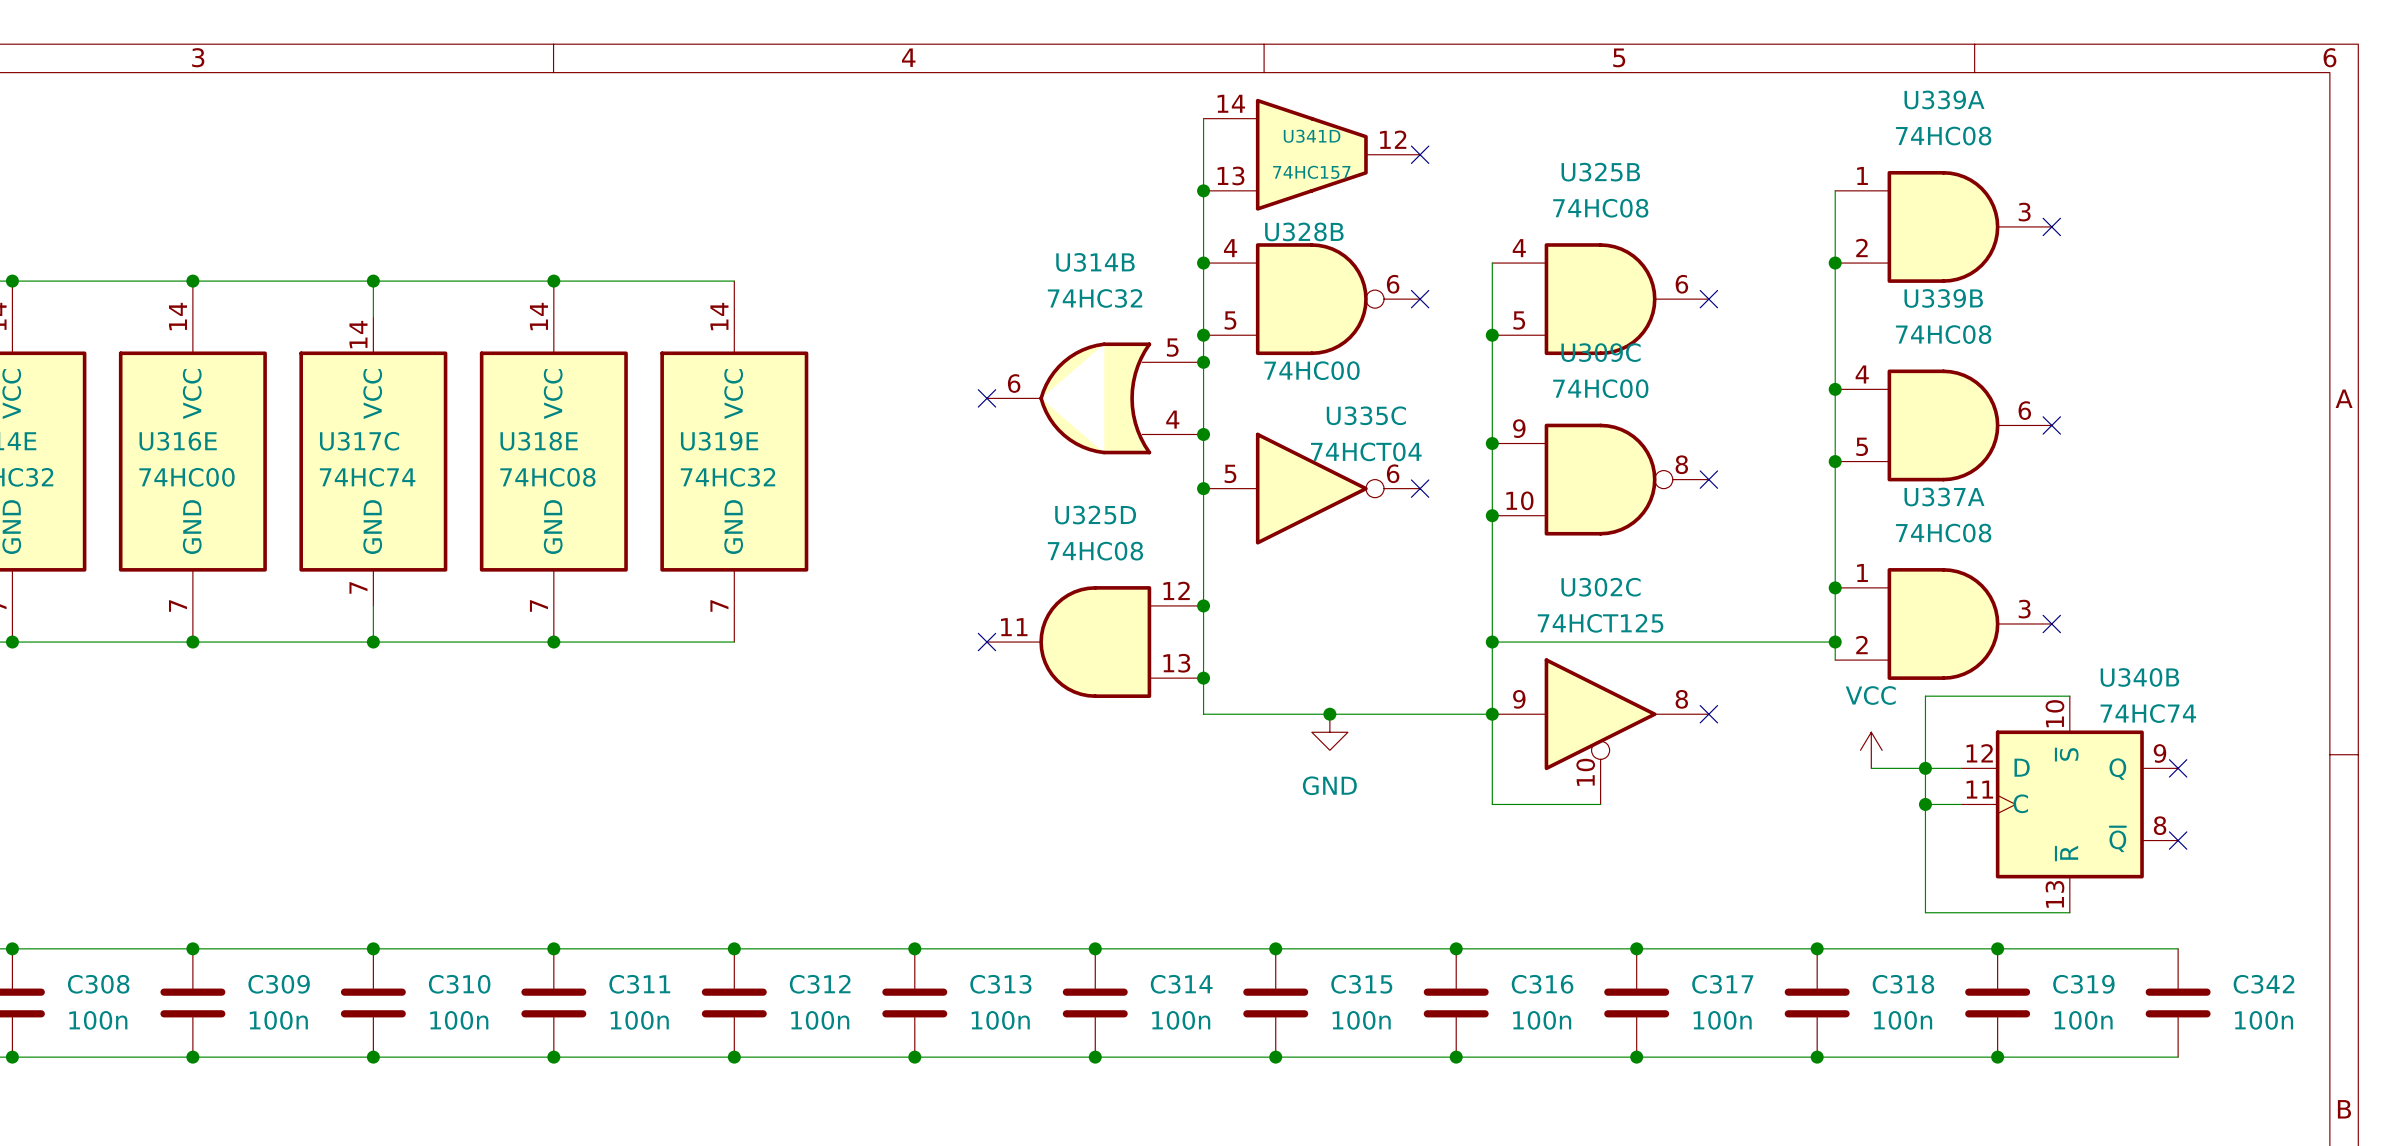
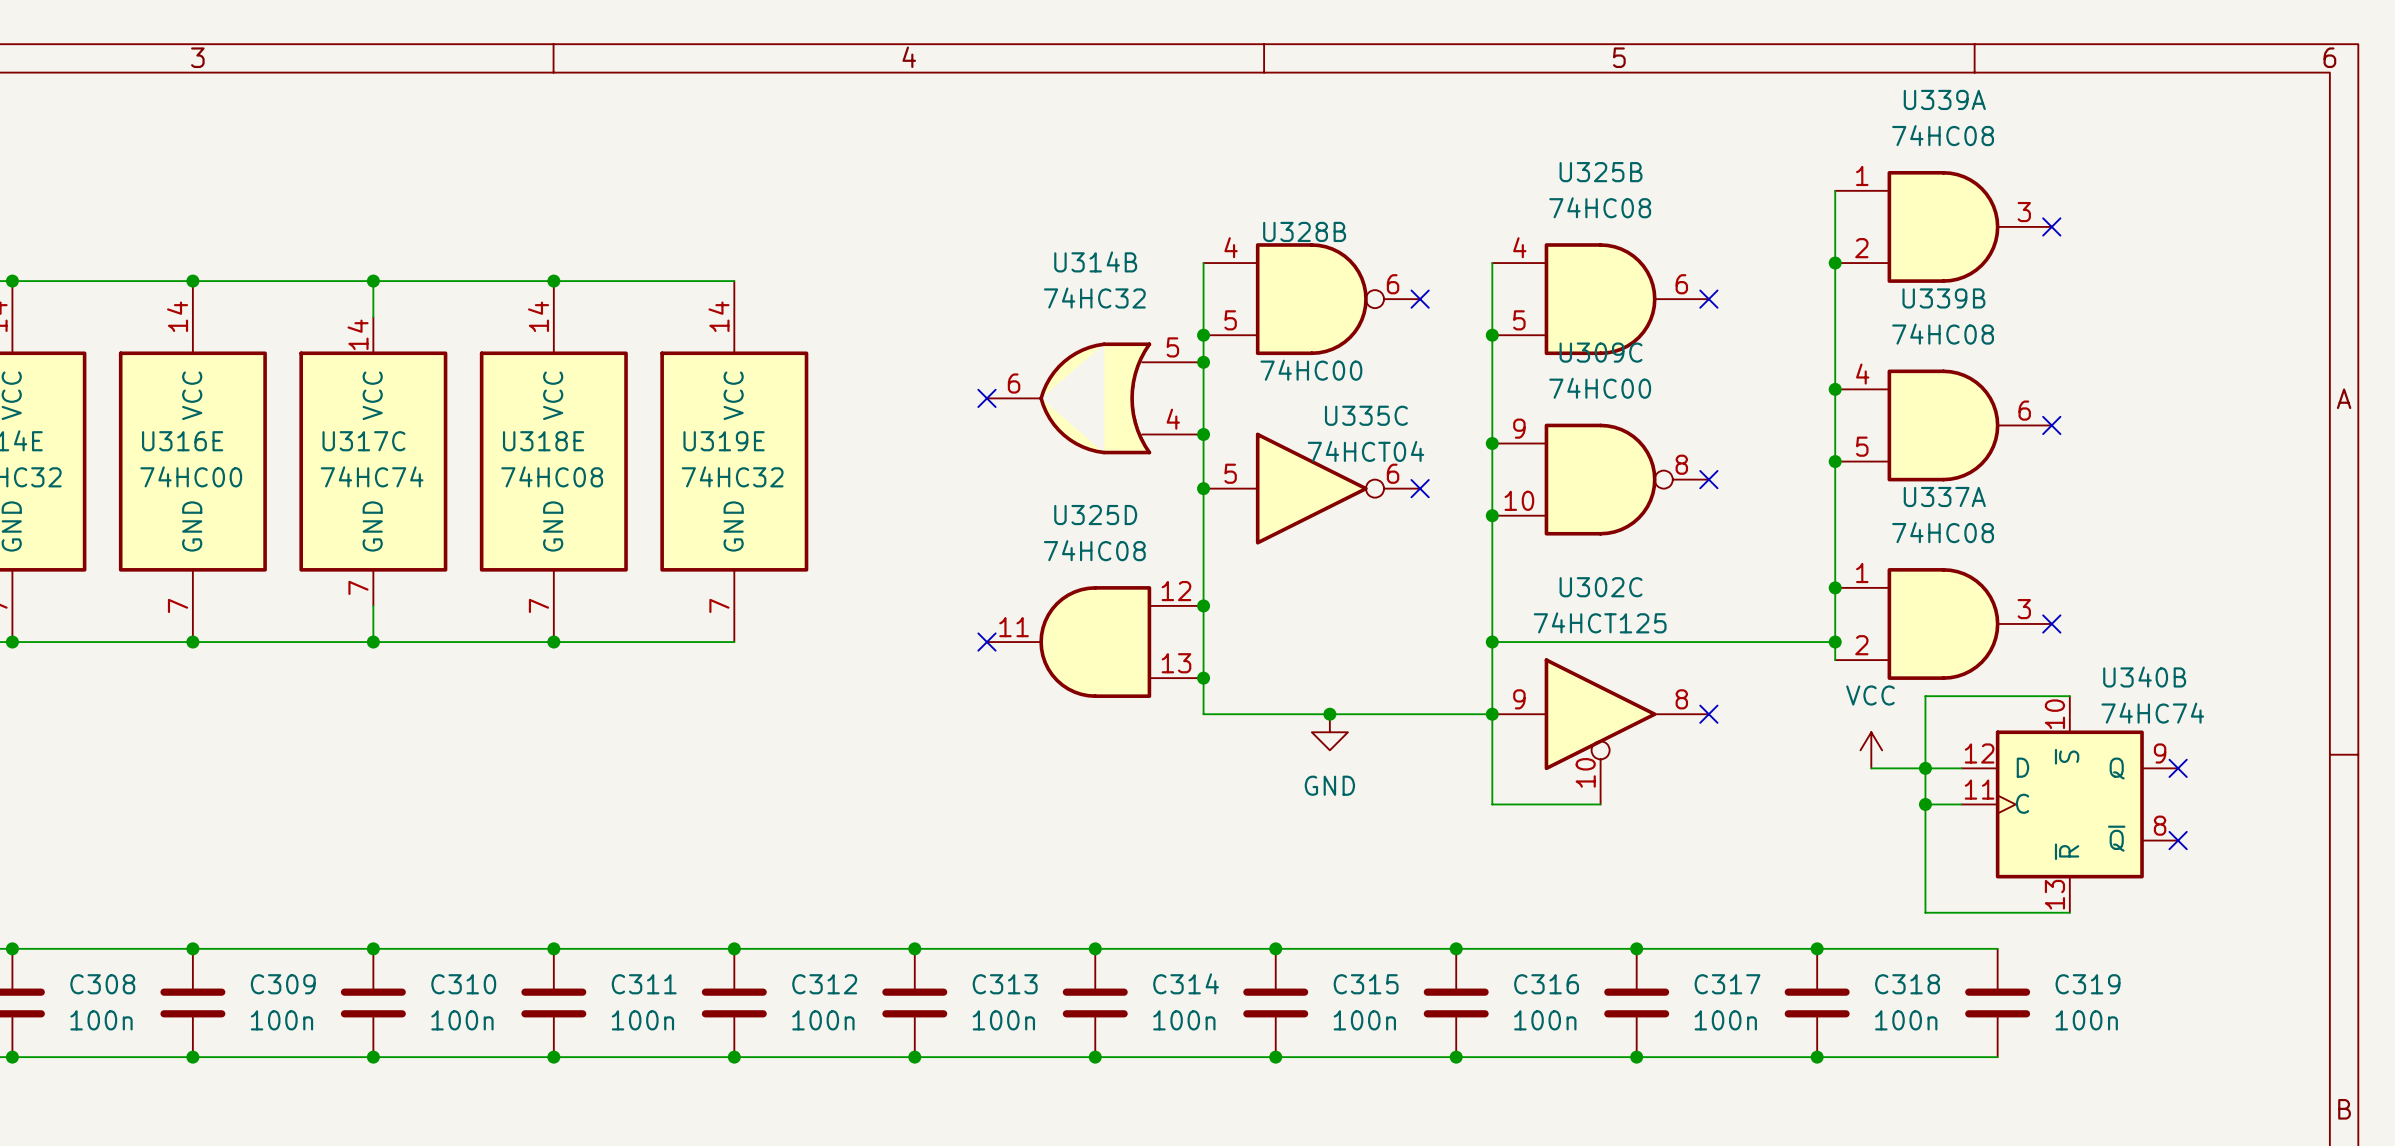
wire: (1203, 118) (1203, 263) -> none
U341D: 74HC157 (1311, 154) -> none
no-connect mark: (1420, 154) -> none
junction: (1203, 190) -> none
junction: (1203, 263) -> none
wire: (1997, 948) (2178, 948) -> none
junction: (1997, 948) -> none
C342: 100n (2178, 1002) -> none
wire: (1997, 1057) (2178, 1057) -> none
junction: (1997, 1057) -> none

